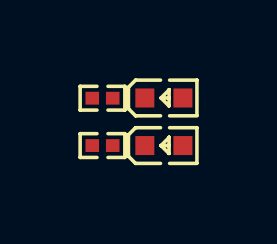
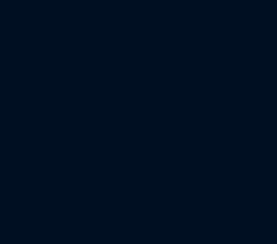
part: (162, 97) -> none
part: (102, 98) -> none
part: (102, 145) -> none
part: (162, 145) -> none

